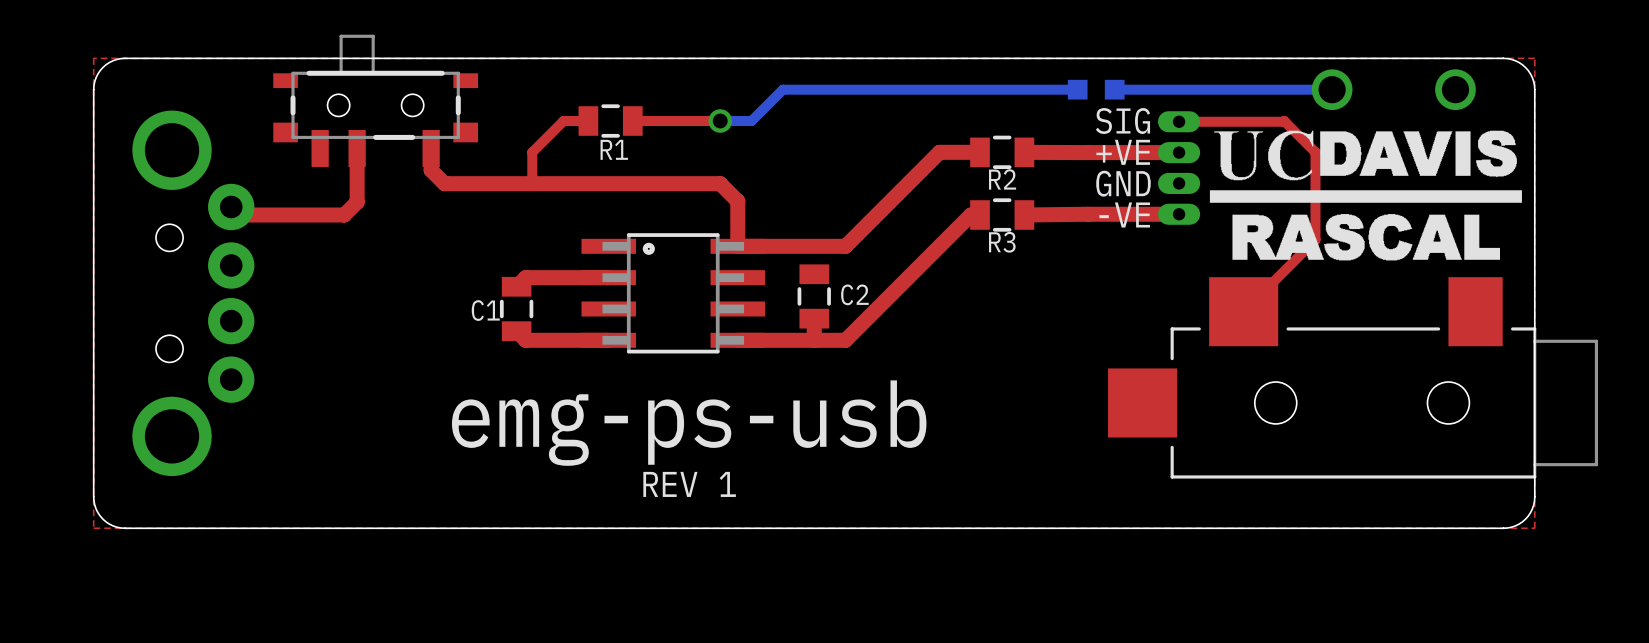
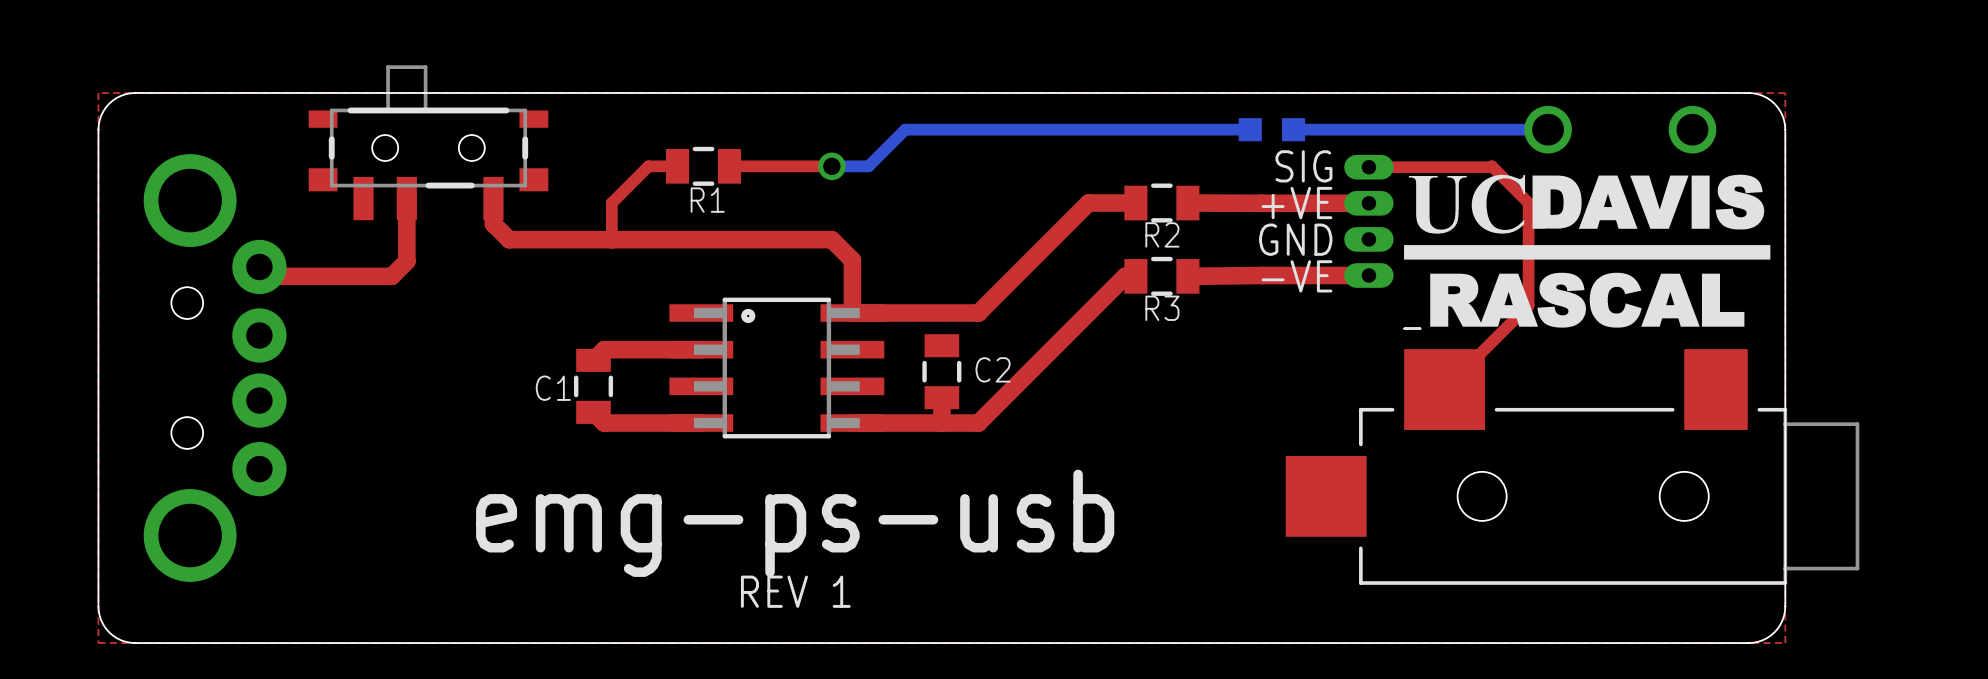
drawing shape: [1209, 130, 1522, 261] -> [1403, 174, 1771, 329]

